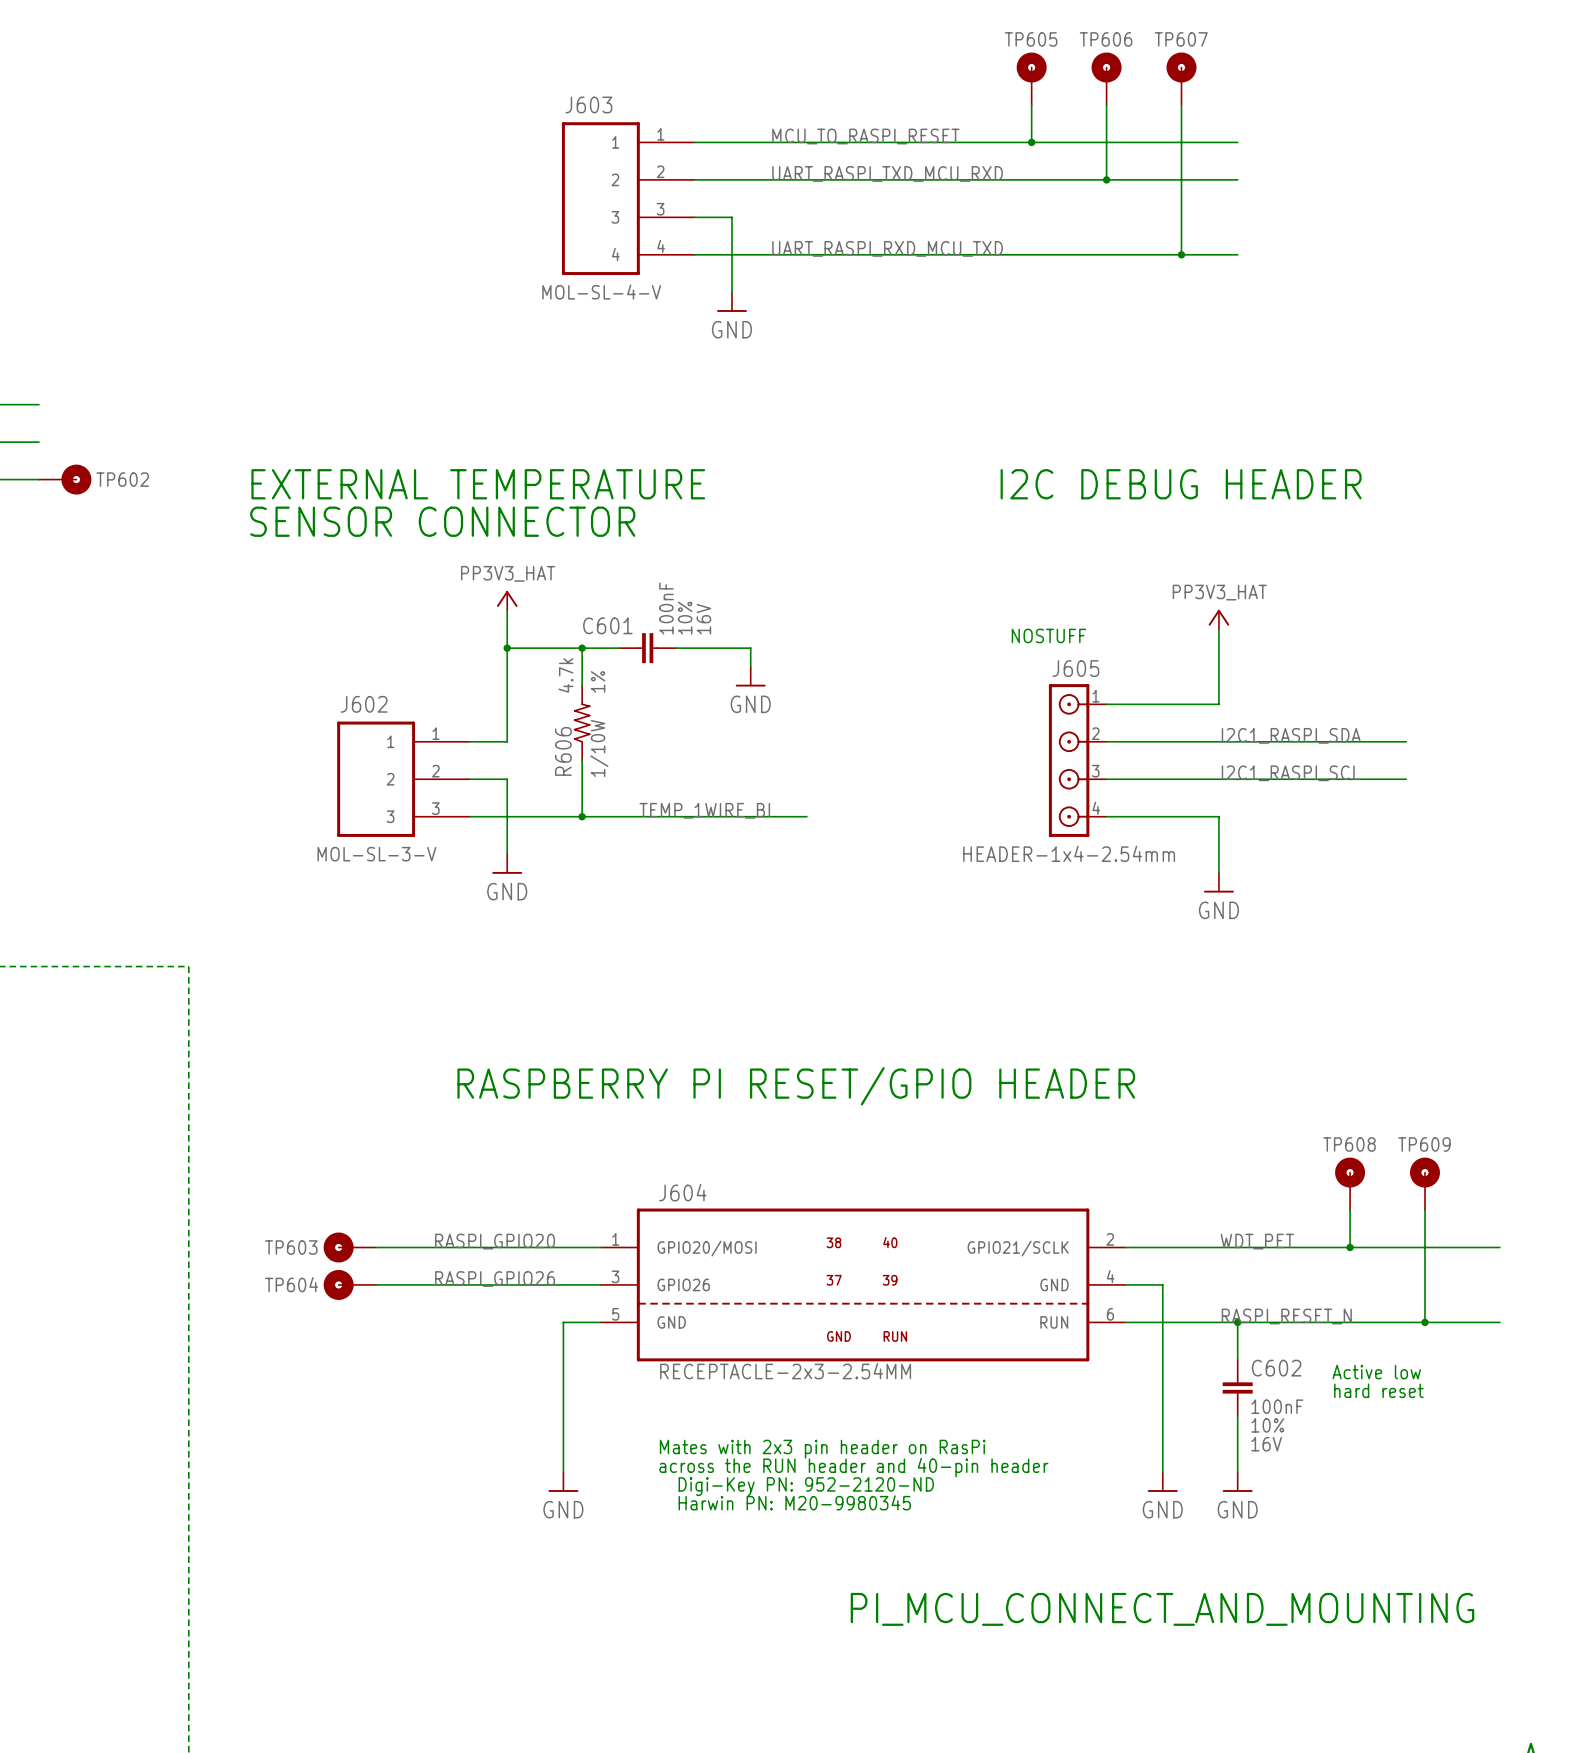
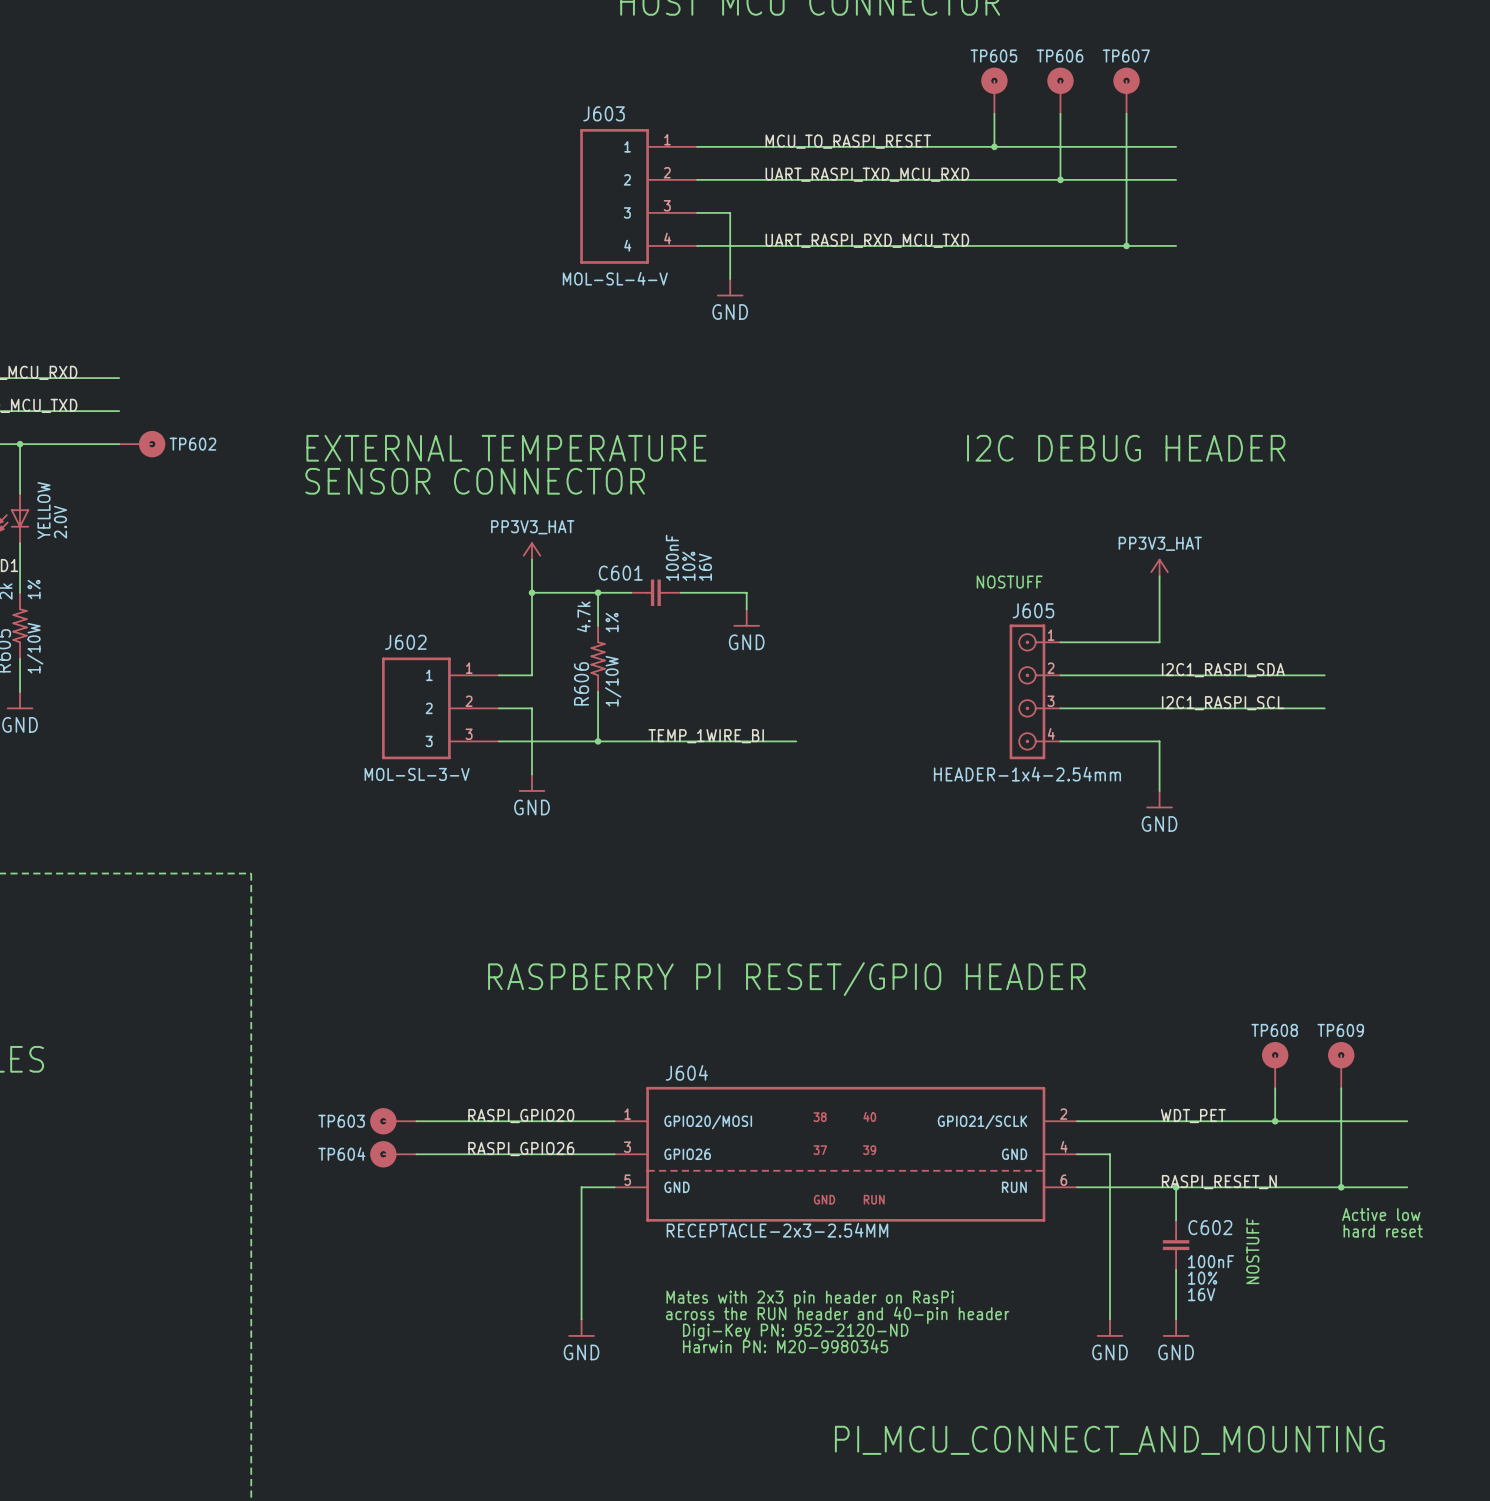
text position: Active low (1376, 1372) -> Active low (1381, 1214)
text position: hard reset (1378, 1390) -> hard reset (1383, 1231)
text: none -> NOSTUFF (1252, 1251)

